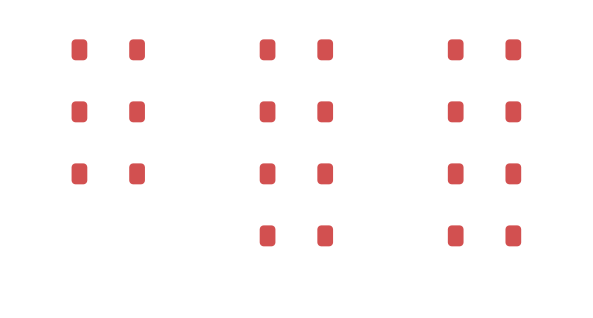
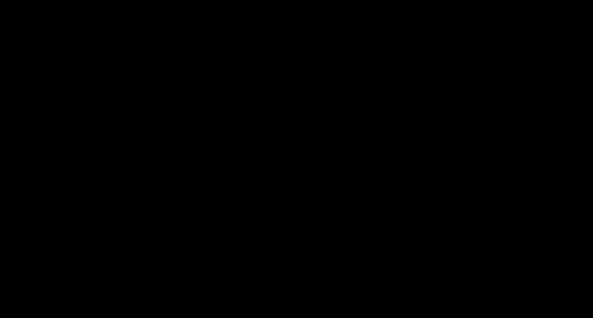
part: (108, 49) -> none
part: (296, 49) -> none
part: (484, 49) -> none
part: (108, 111) -> none
part: (296, 111) -> none
part: (484, 111) -> none
part: (108, 173) -> none
part: (296, 173) -> none
part: (484, 173) -> none
part: (296, 235) -> none
part: (484, 235) -> none

